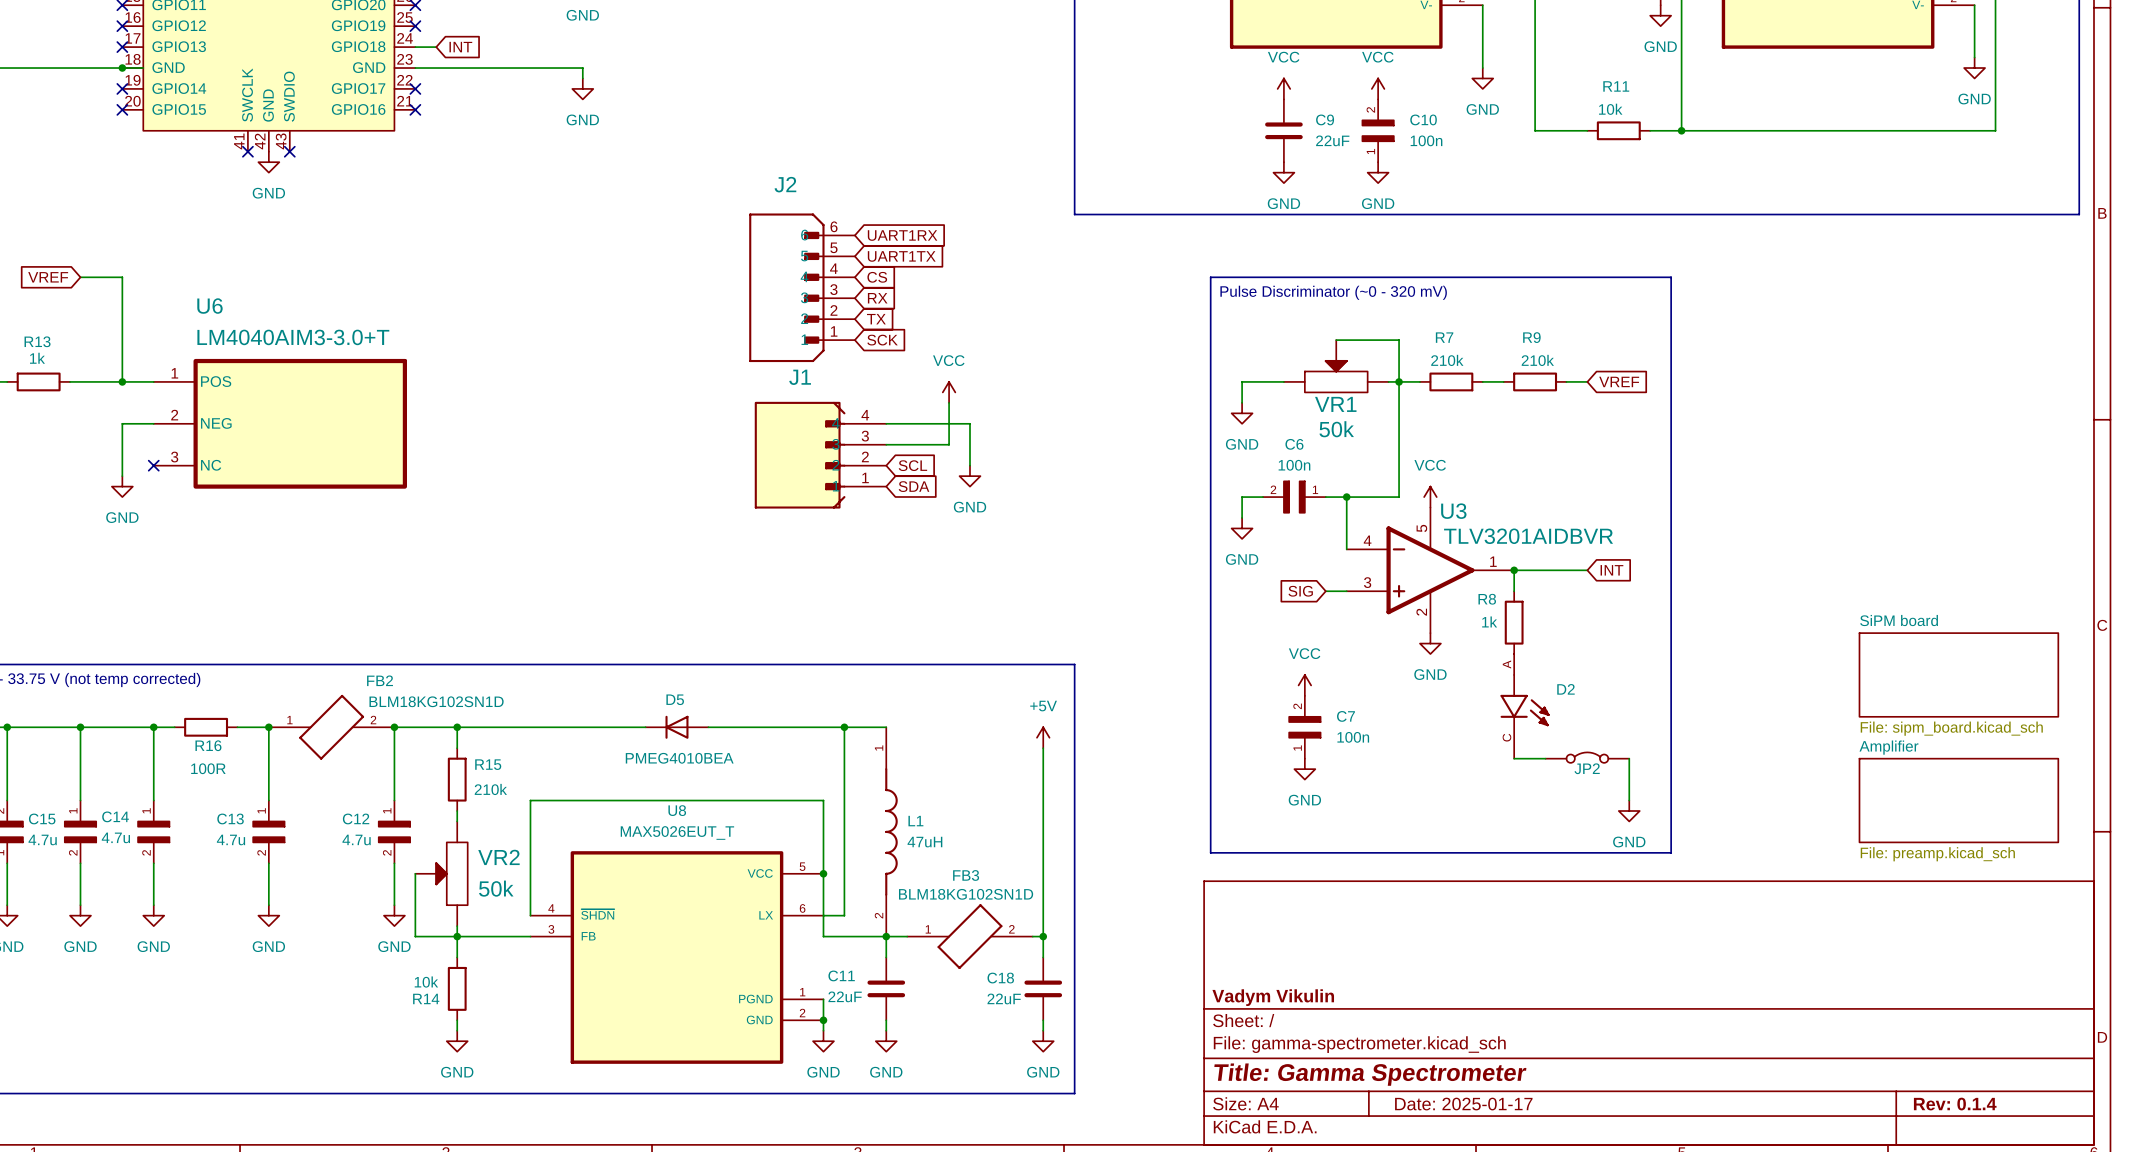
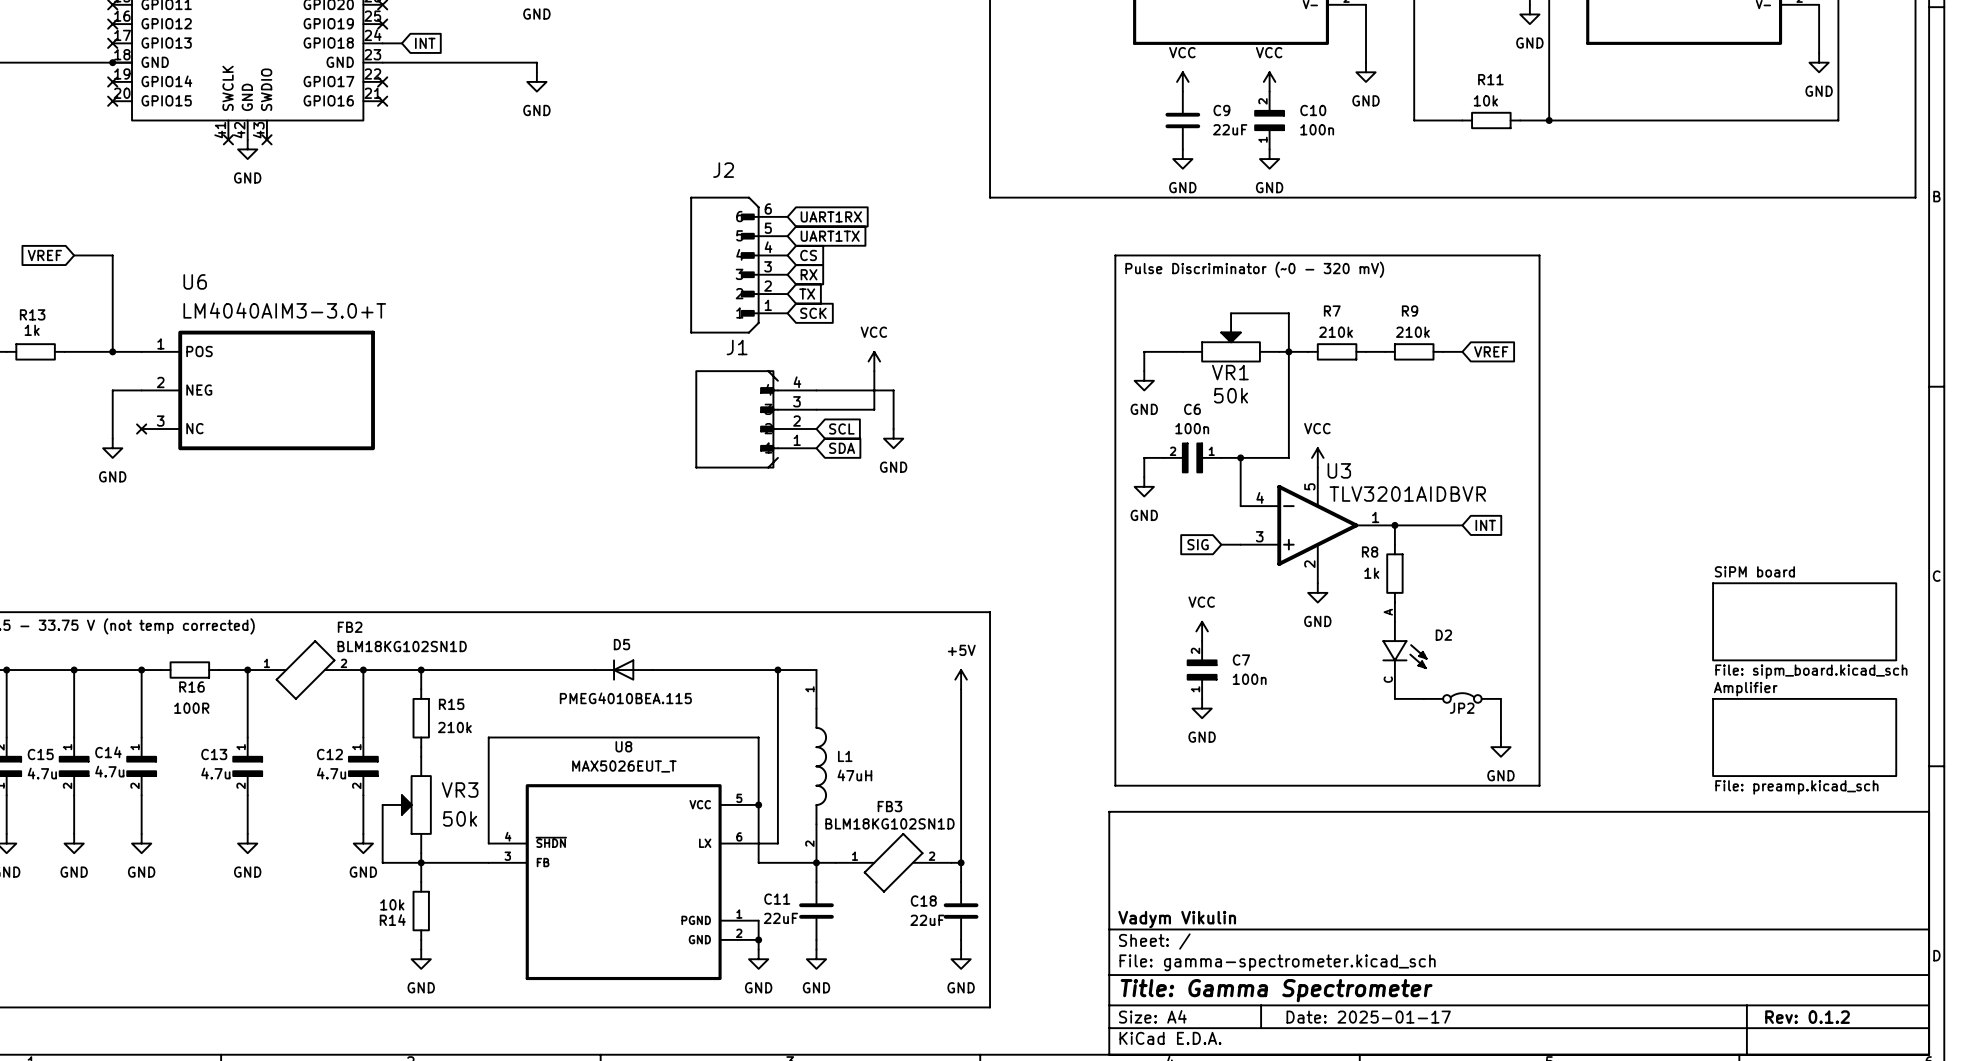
D5 value: PMEG4010BEA (679, 758) -> PMEG4010BEA.115 (625, 698)
VR2 name: VR2 (498, 857) -> VR3 (460, 790)
title block: Rev: 0.1.4 (1955, 1104) -> Rev: 0.1.2 (1807, 1017)

